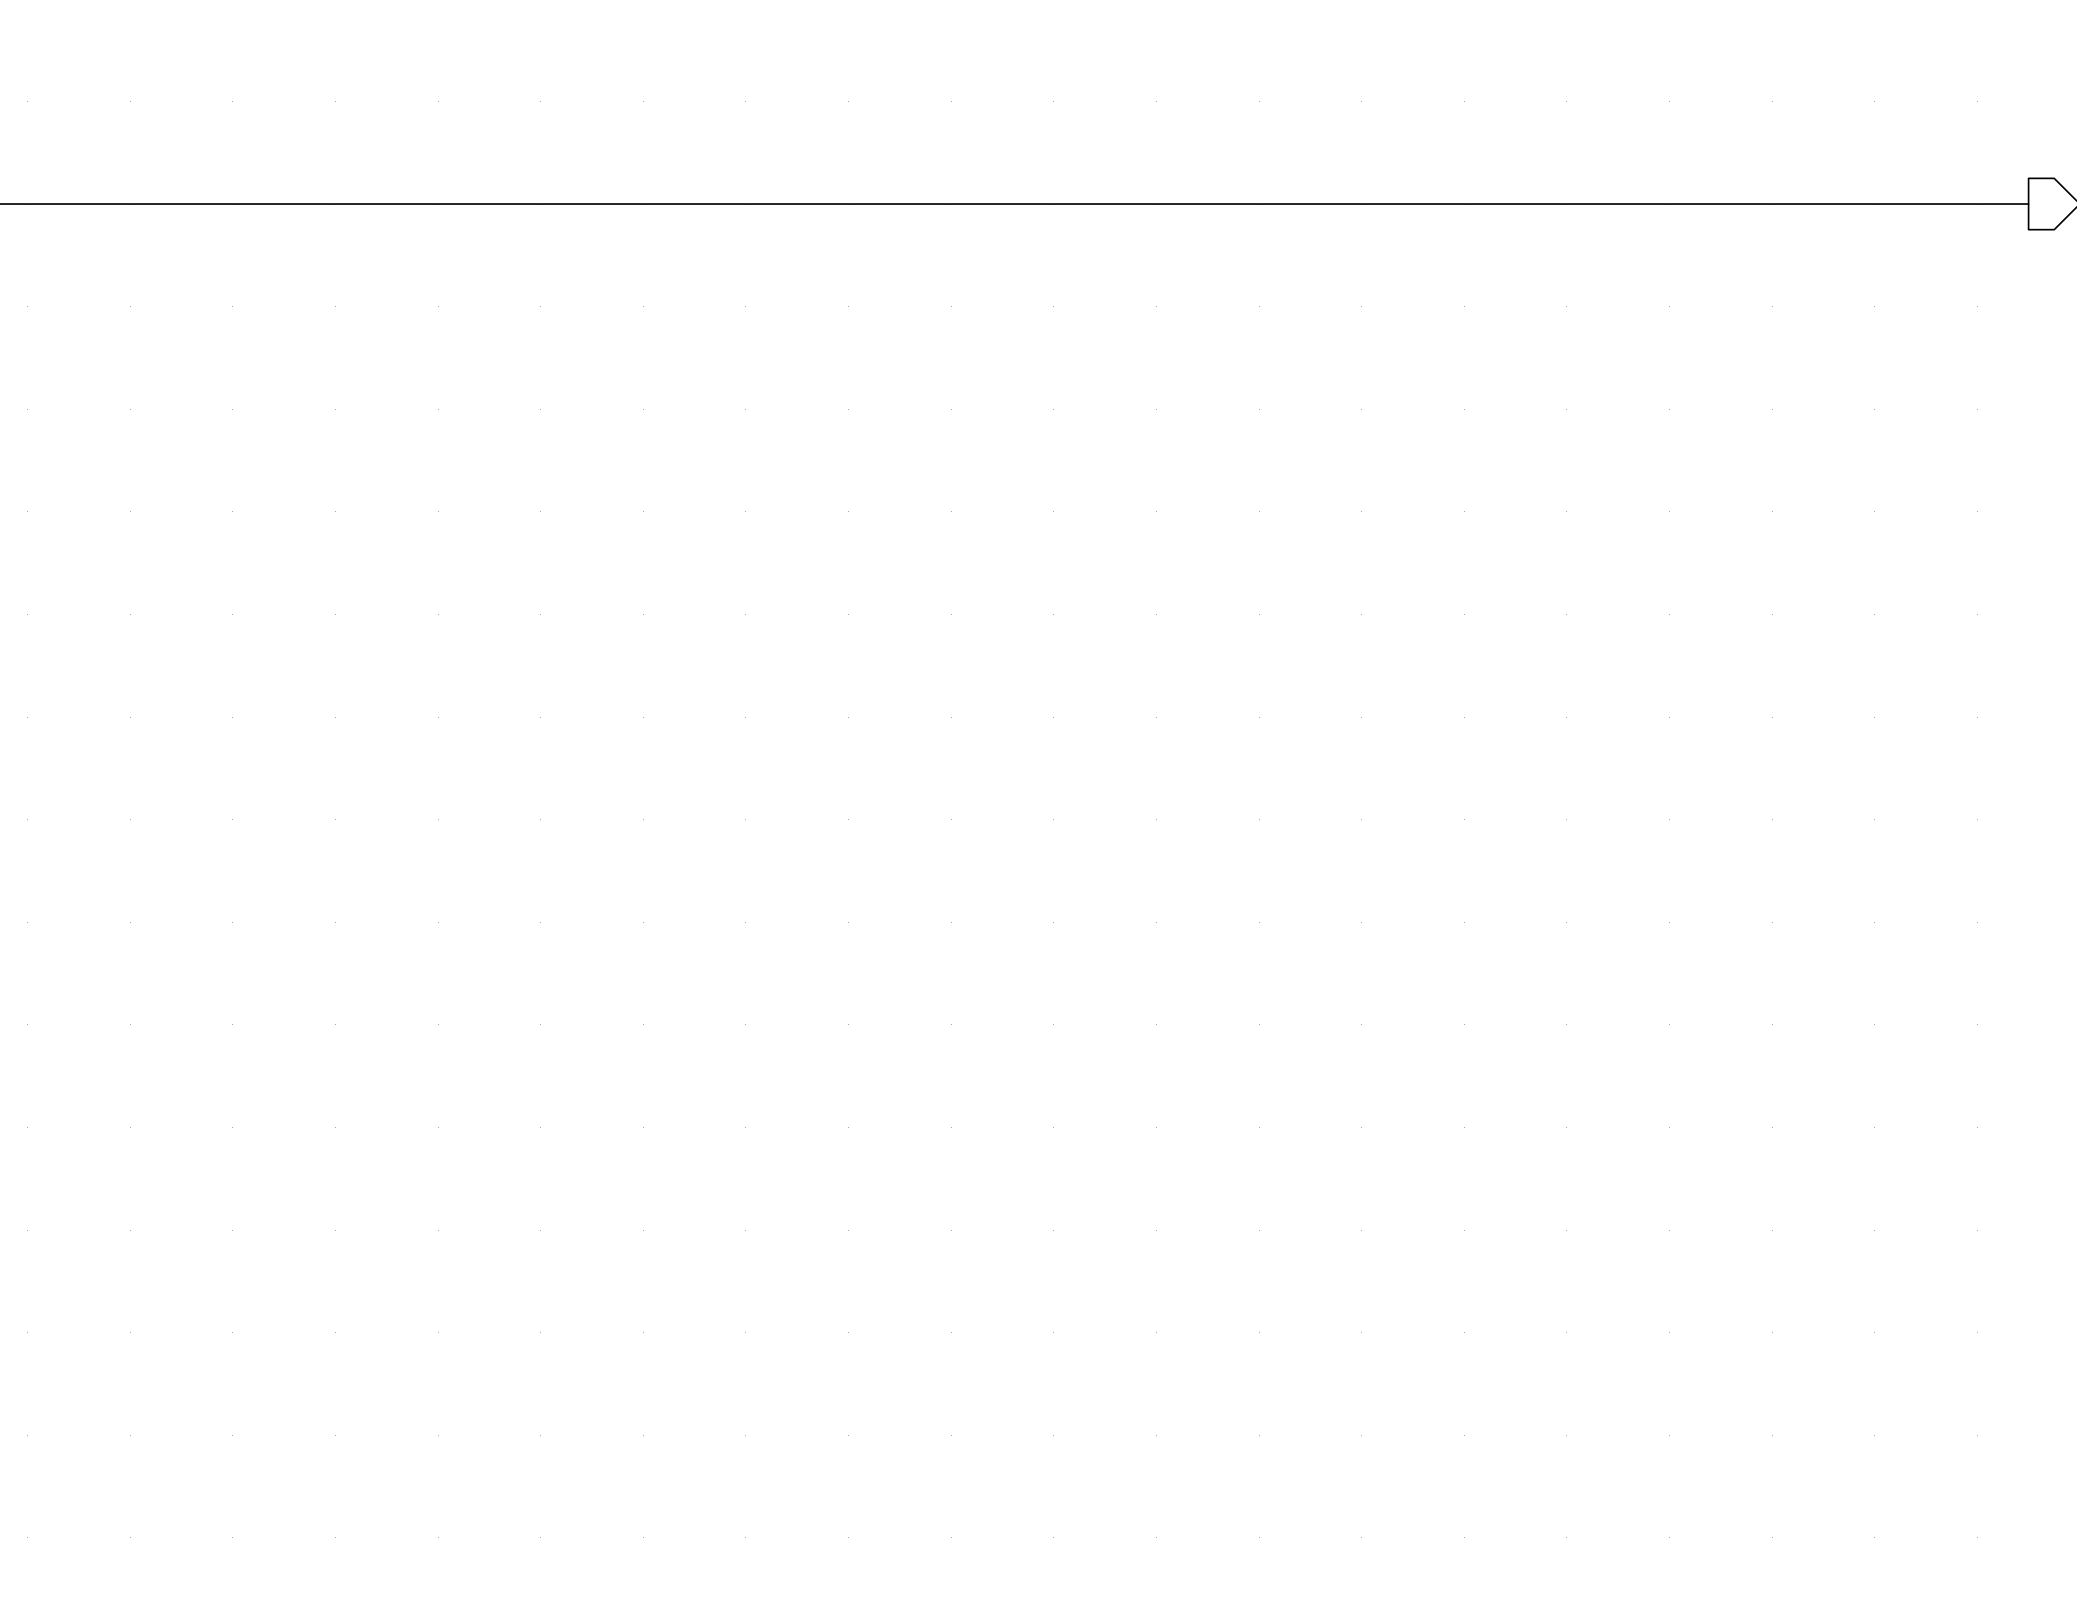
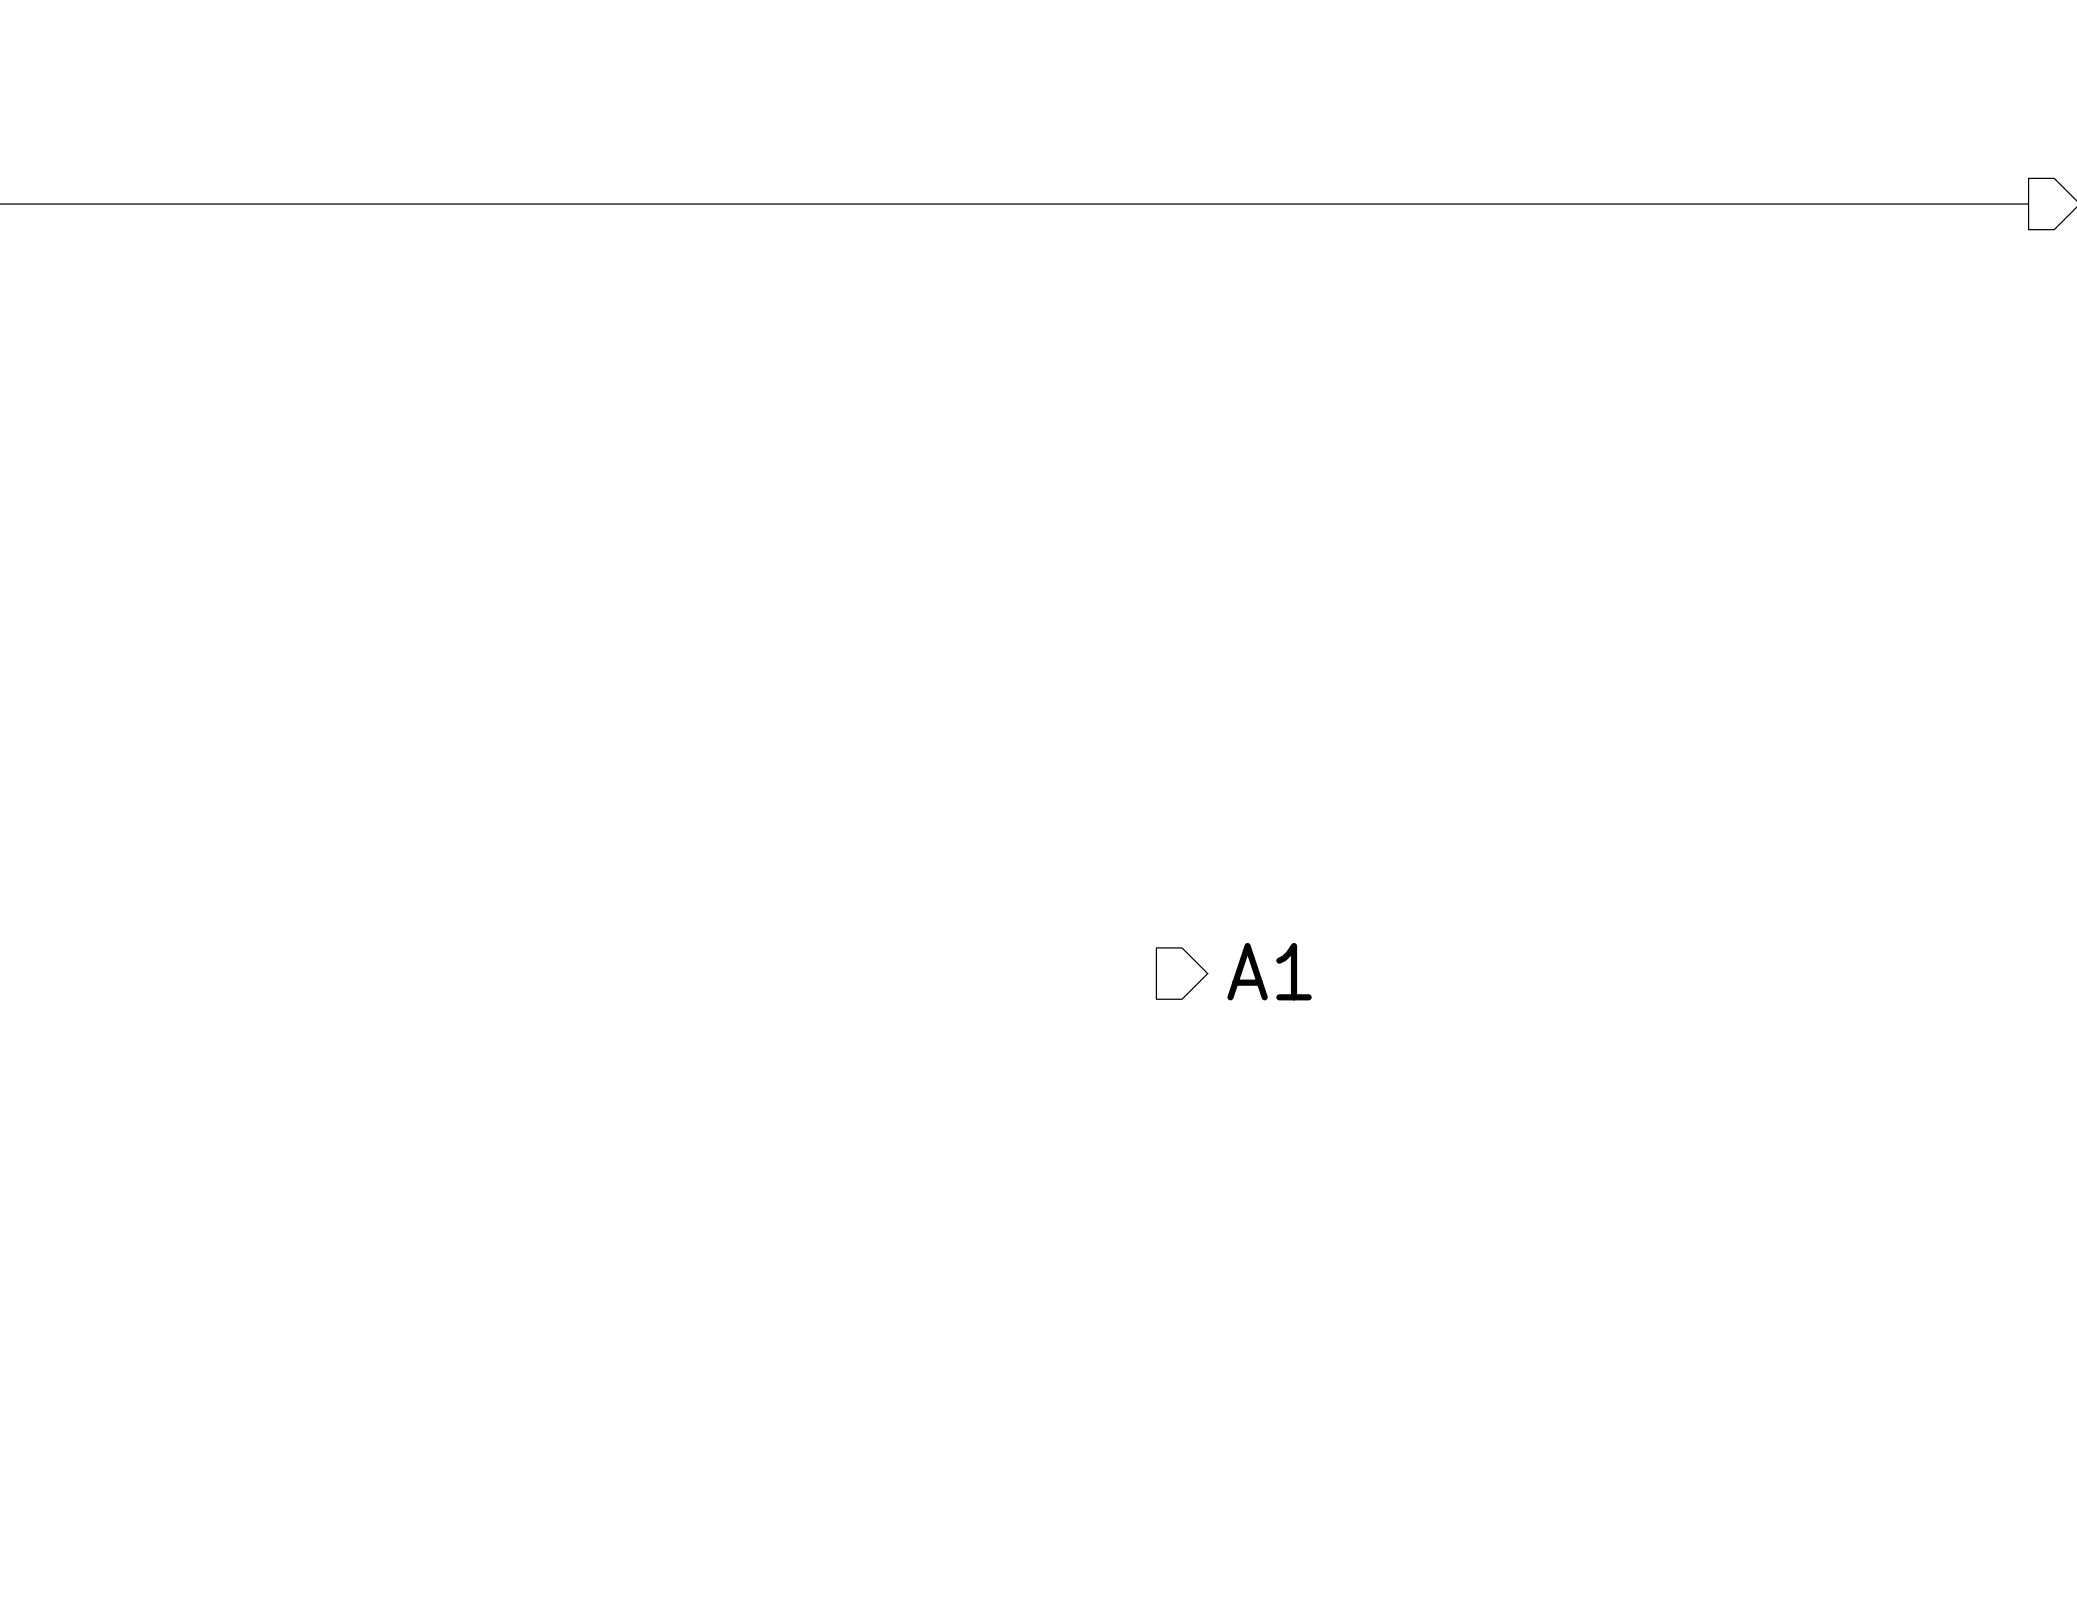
hierarchical label: none -> A1 (1269, 971)

